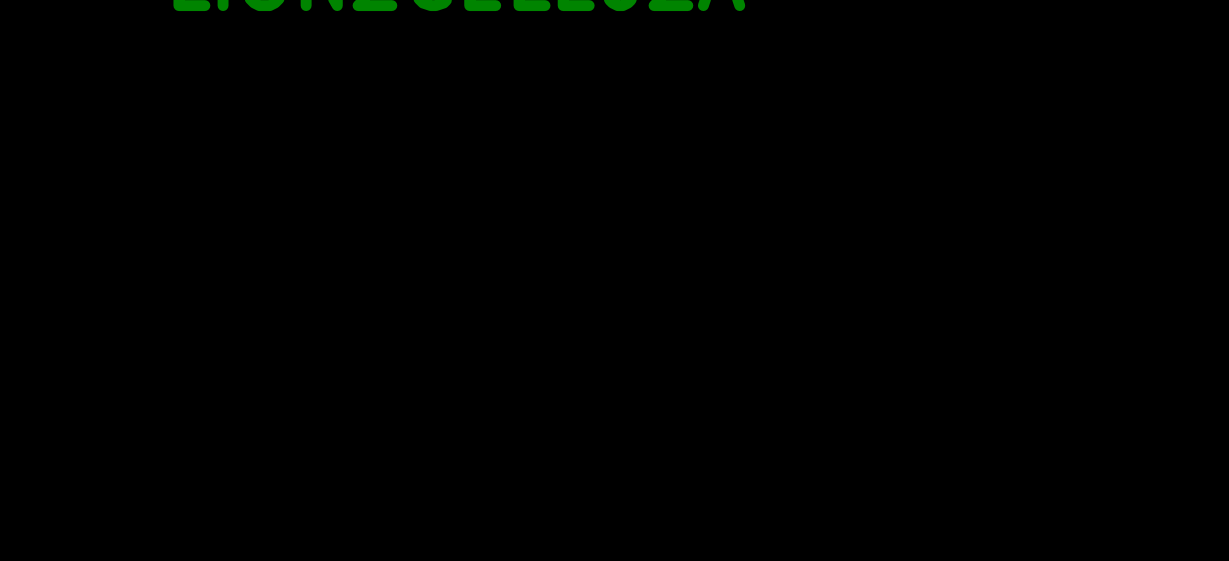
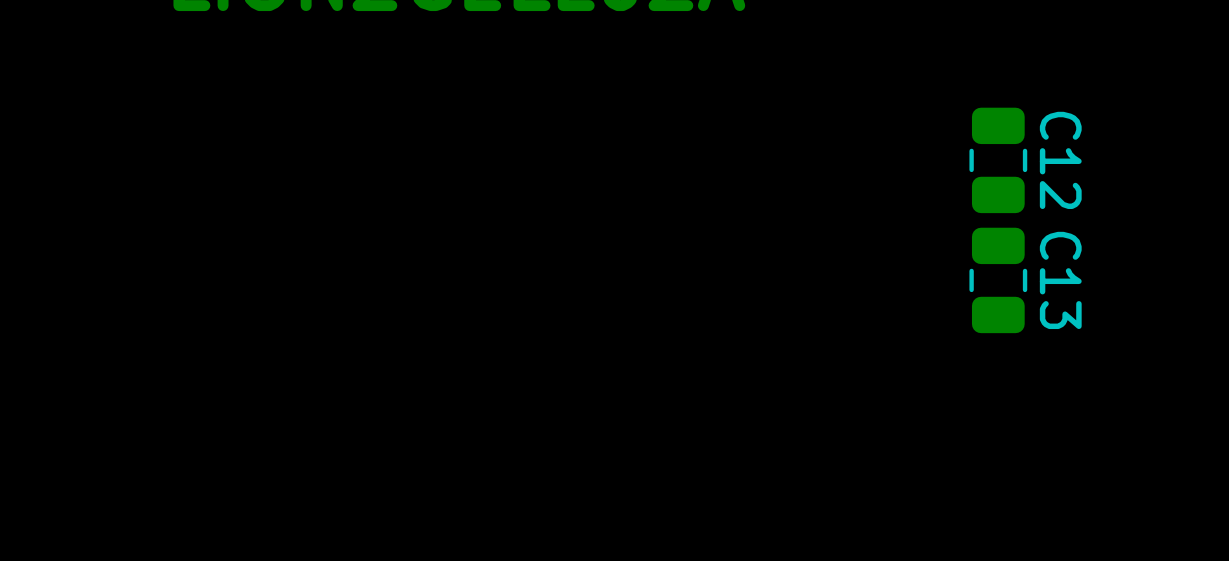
C12: none -> (998, 160)
C13: none -> (998, 280)

